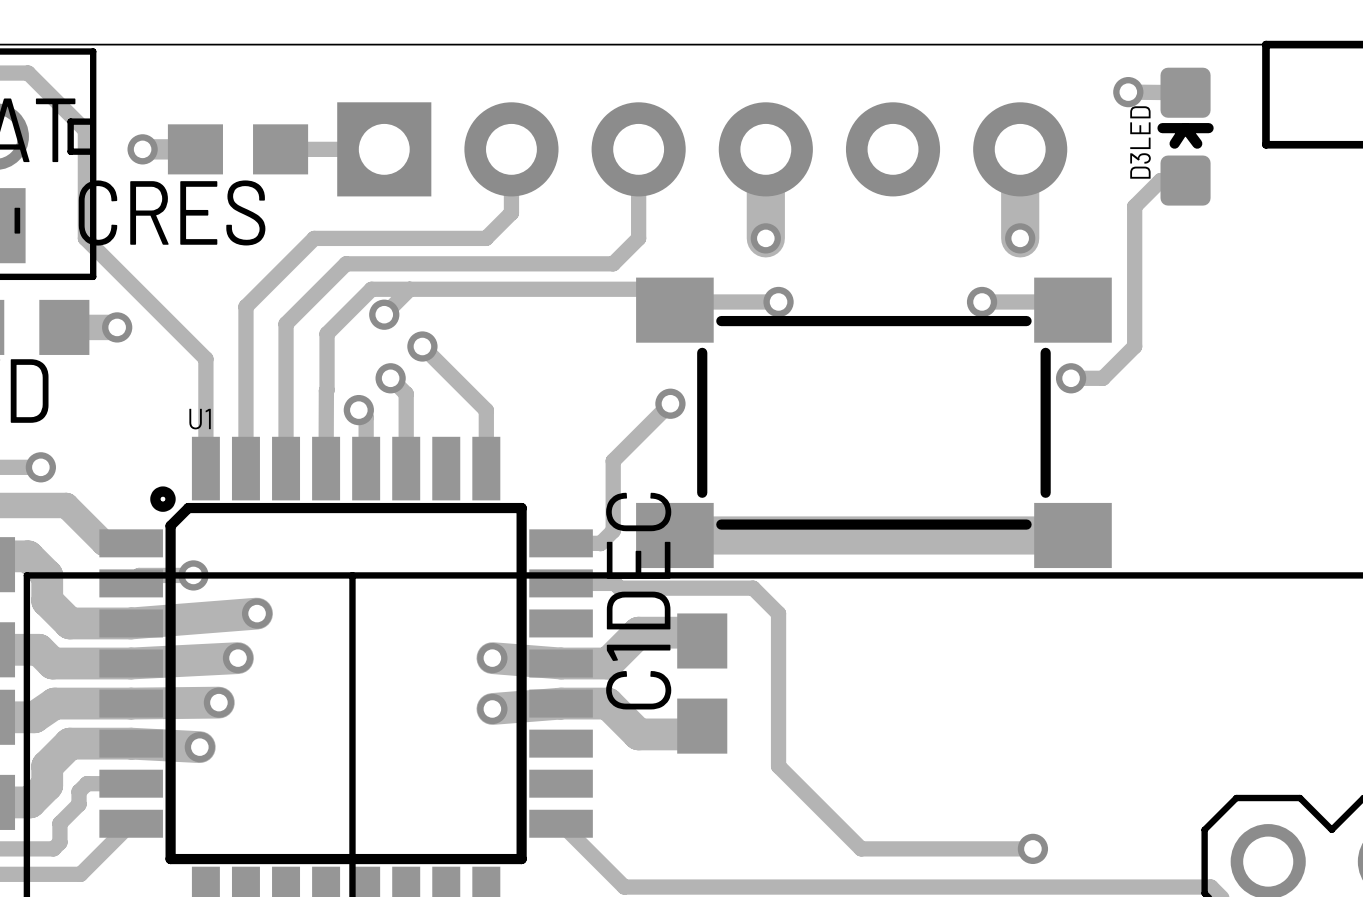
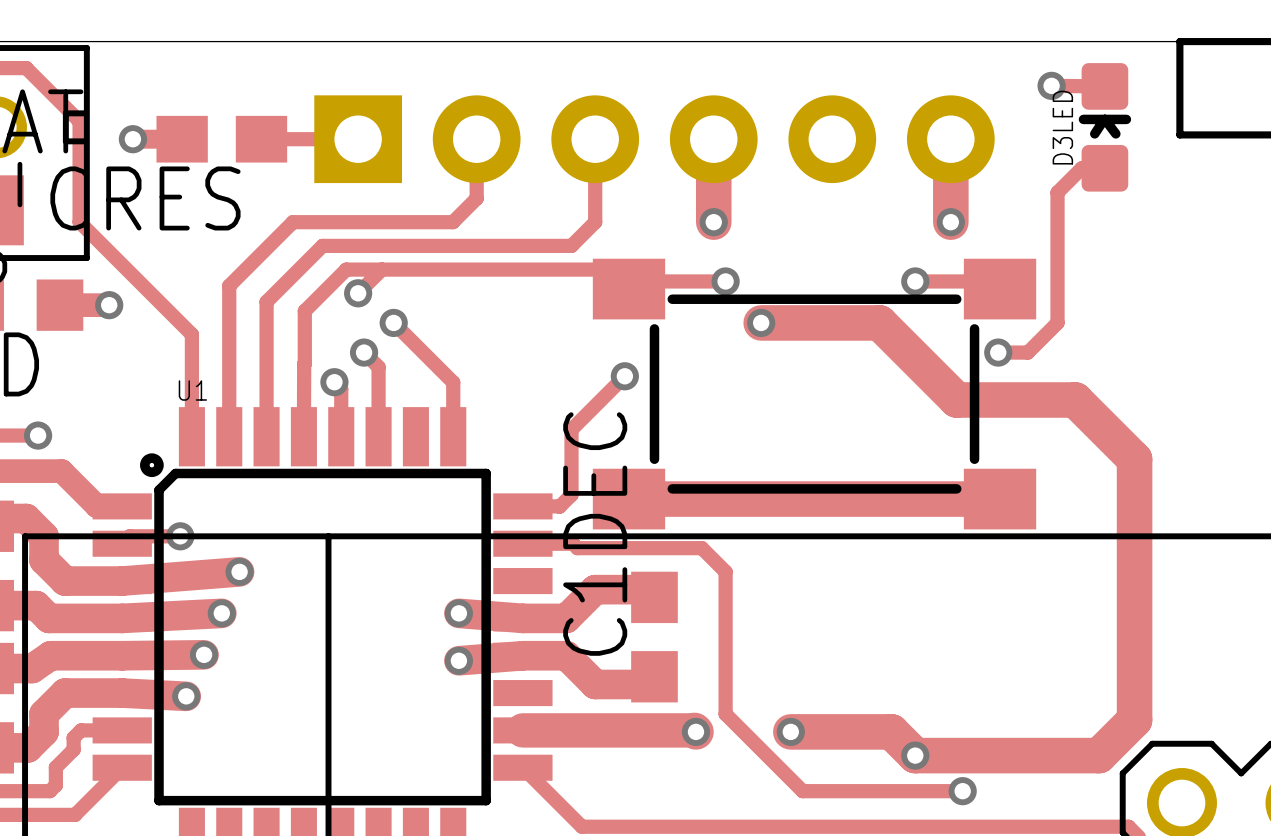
track: none -> (761, 322) (879, 322) (956, 399) (1075, 399) (1134, 459) (1134, 720) (1099, 755) (915, 755) (891, 731) (790, 731)
via: none -> (761, 322)
track: none -> (522, 730) (695, 731)
via: none -> (695, 731)
via: none -> (790, 731)
via: none -> (915, 755)

